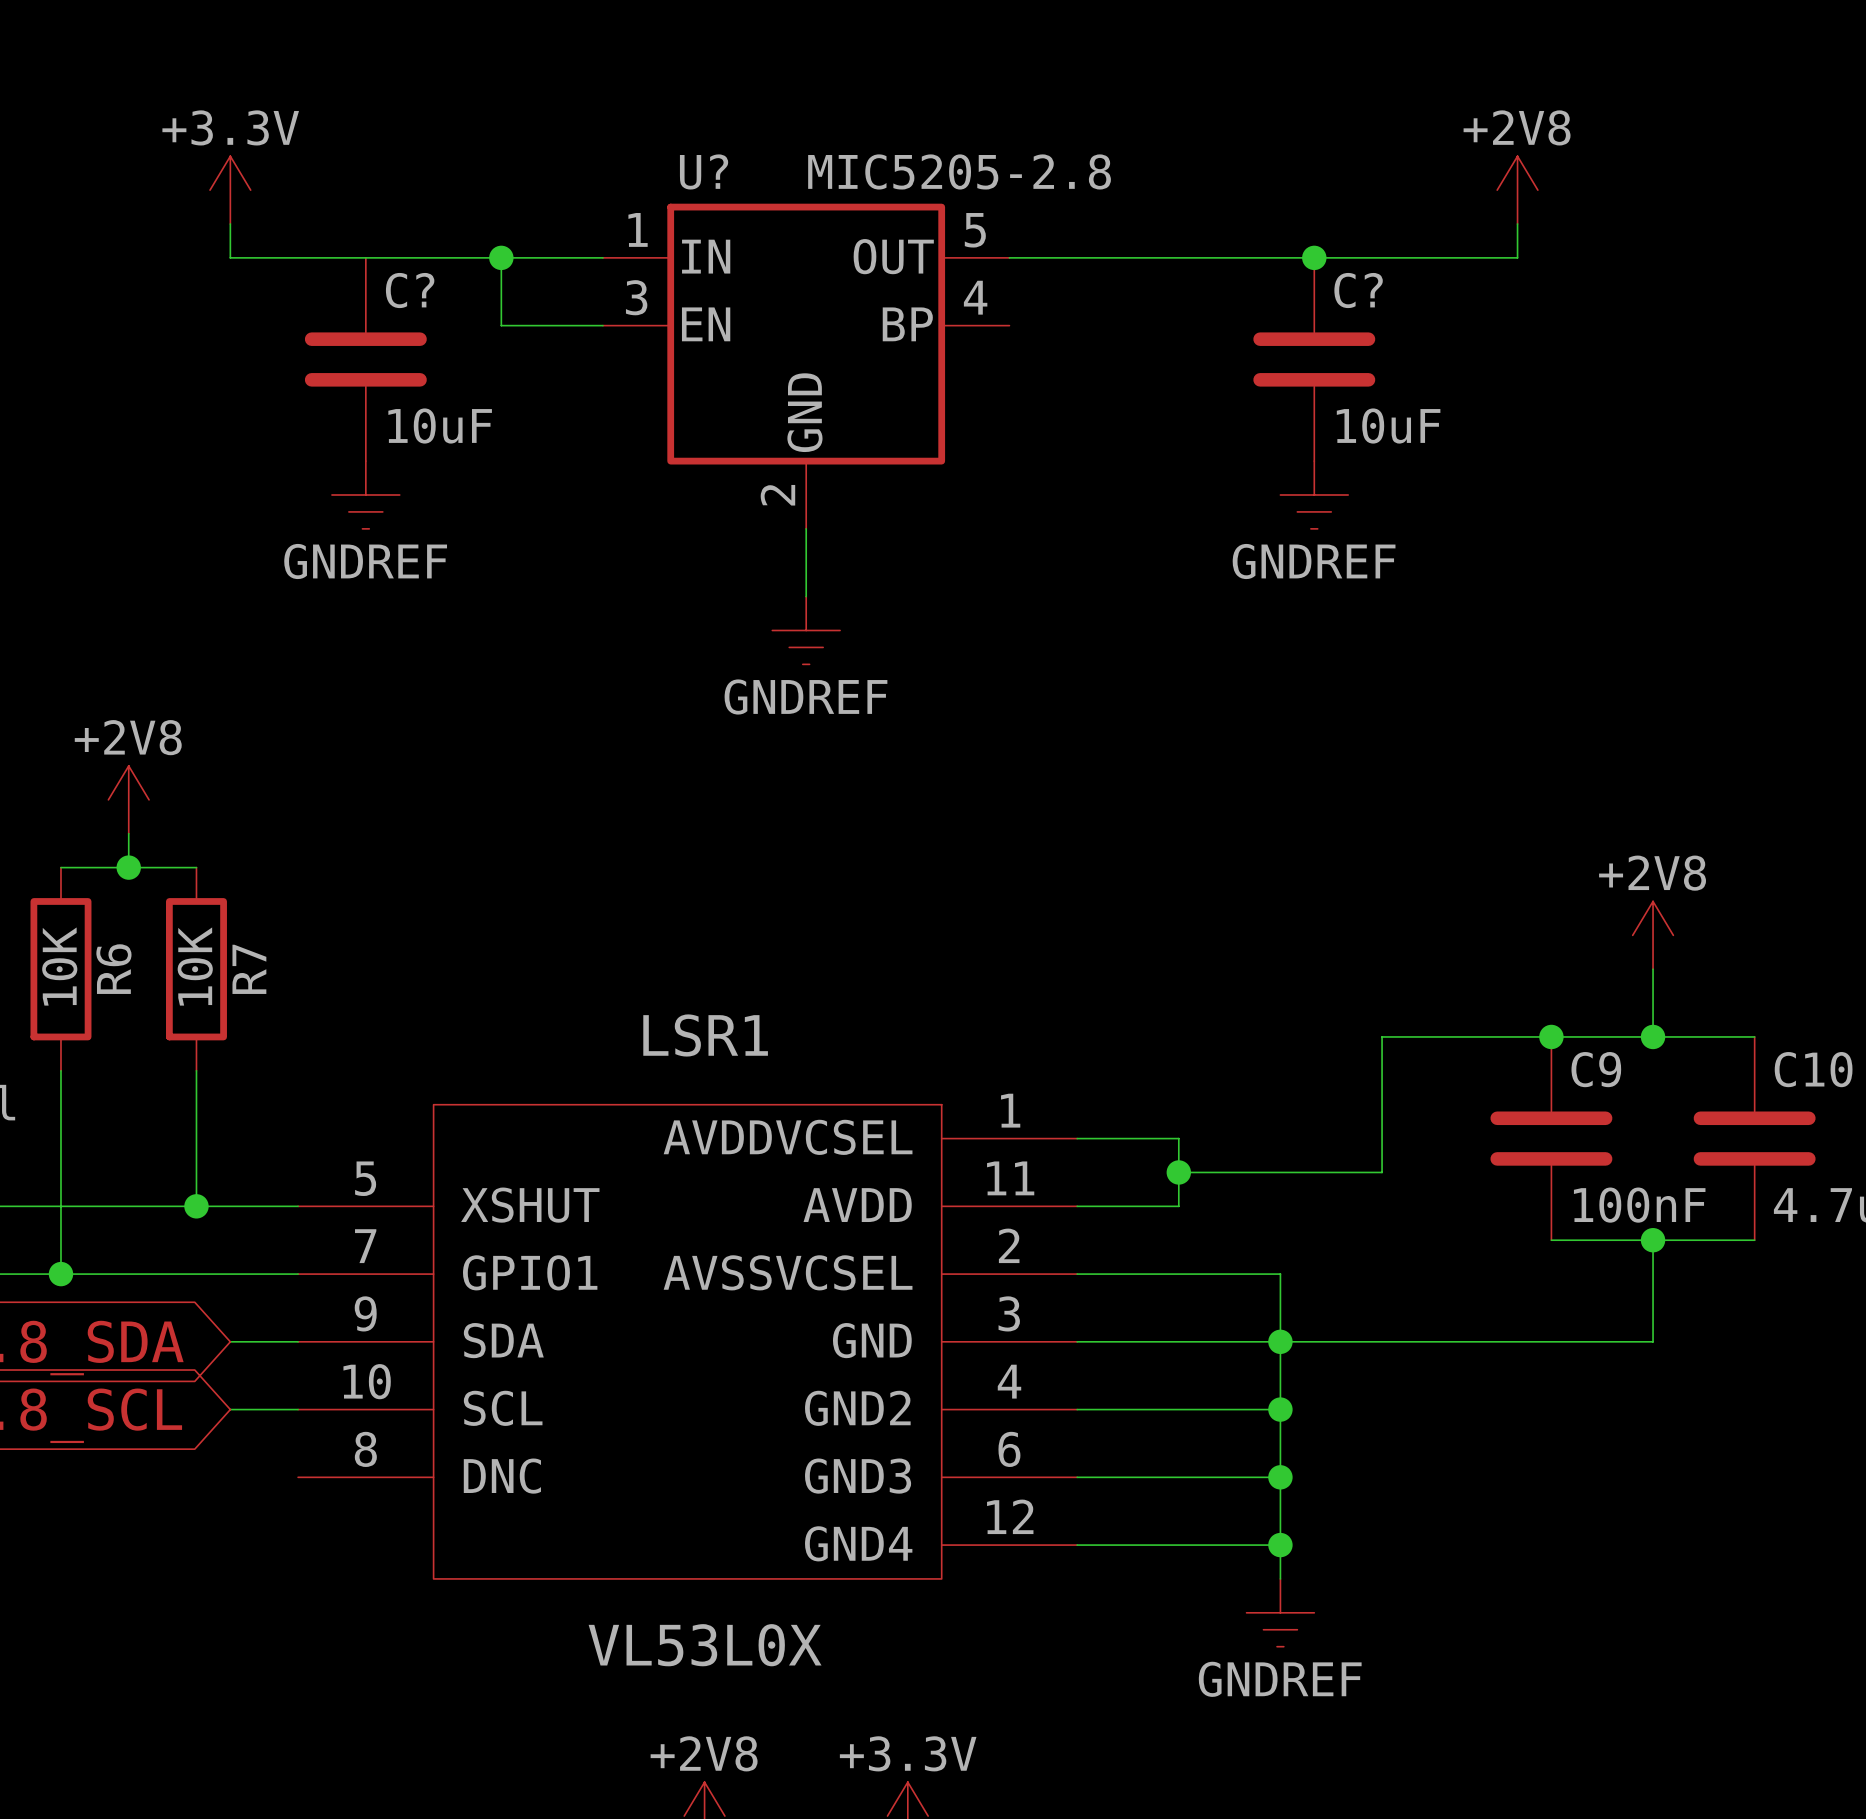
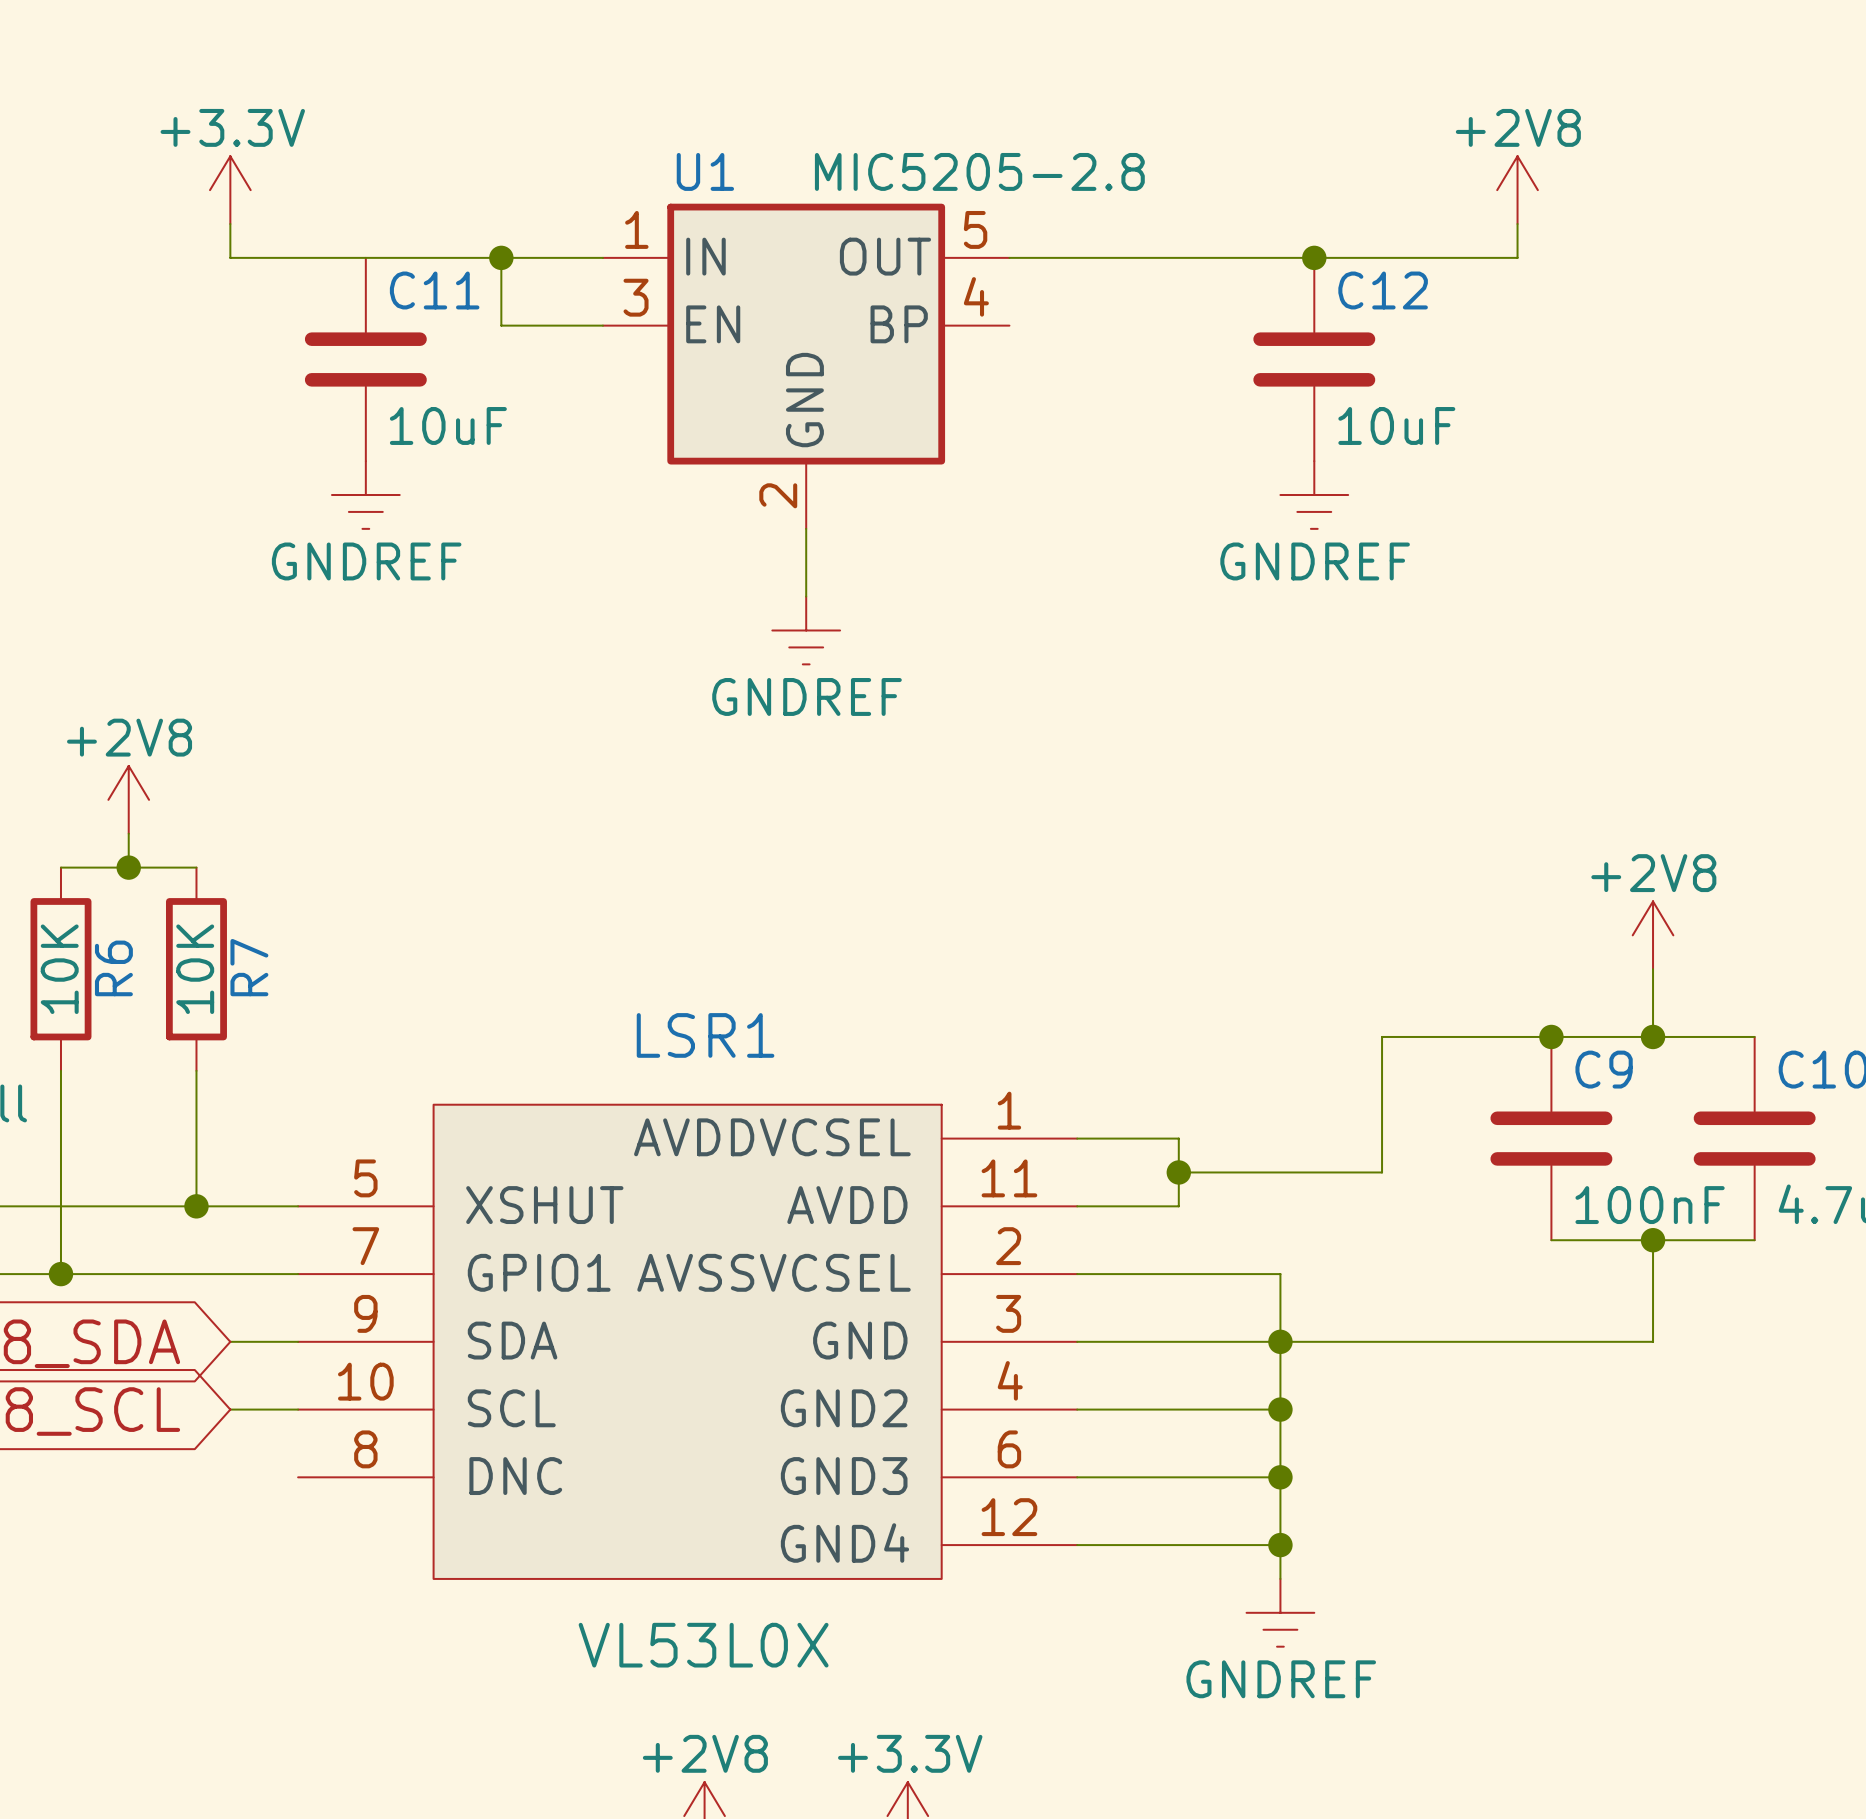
U? name: U? (704, 171) -> U1 (705, 171)
C? name: C? (410, 290) -> C11 (434, 290)
C? name: C? (1358, 290) -> C12 (1383, 290)

